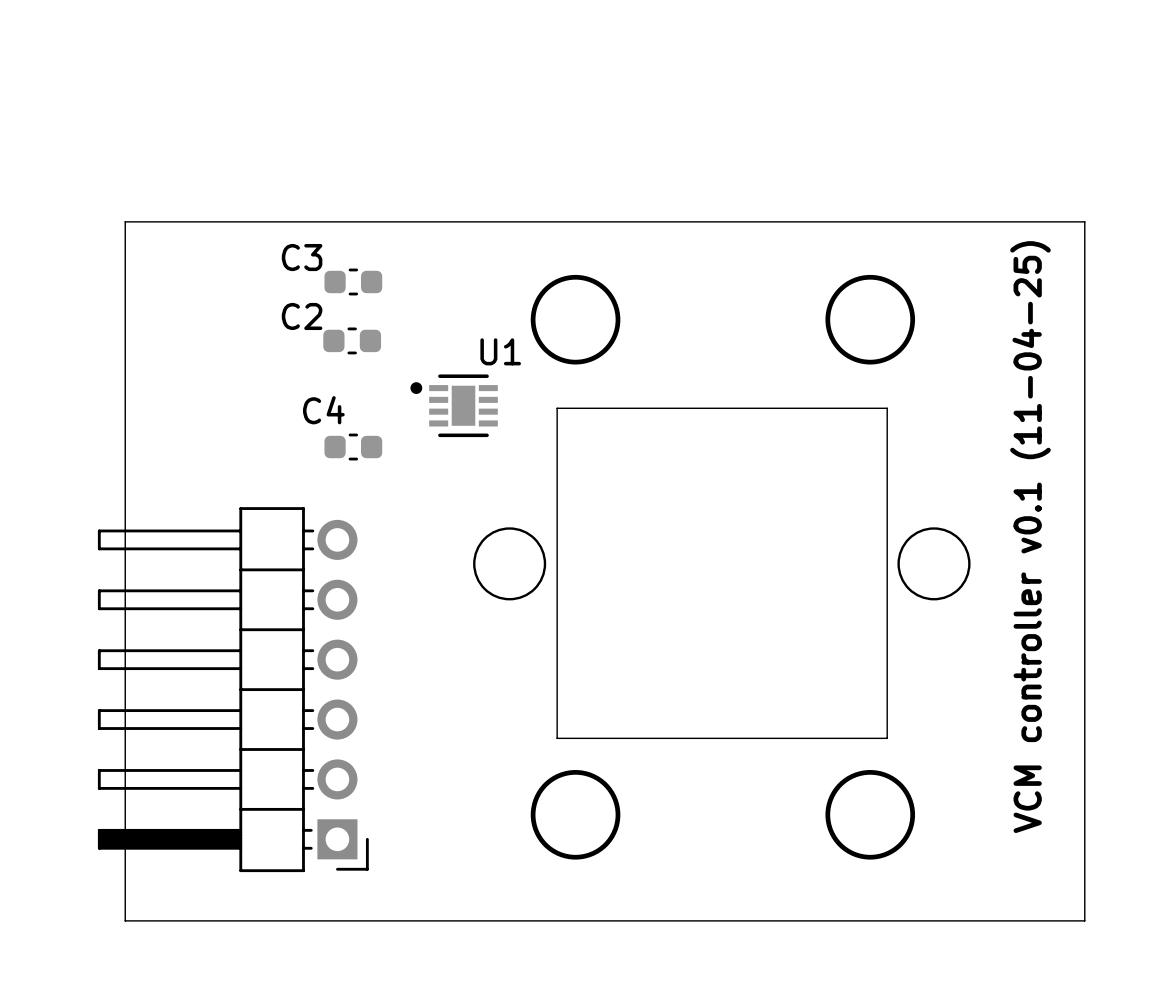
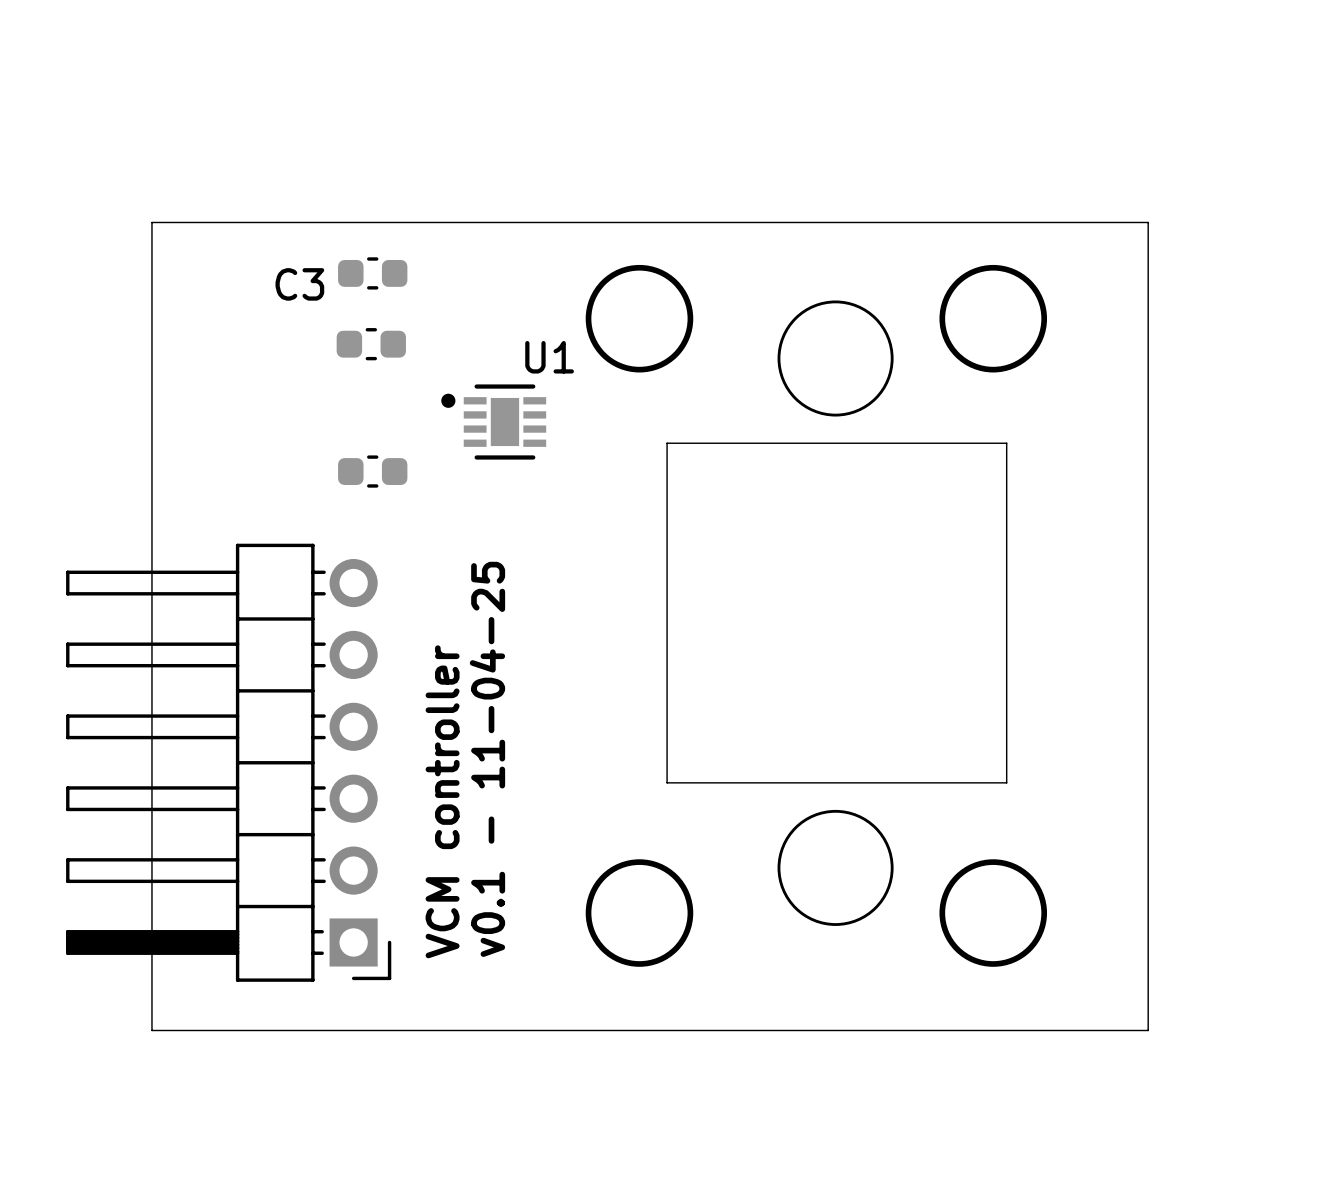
board edge: (125, 221) (1084, 221) (1084, 920) (125, 920) (125, 221) -> (151, 222) (151, 1030) (1148, 1030) (1148, 222) (151, 222)
C3 name position: C3 (302, 257) -> C3 (299, 284)
round board edge: none -> [777, 300, 894, 417]
C2 name: C2 (302, 316) -> none
board edge: (557, 408) (887, 408) (887, 738) (557, 738) (557, 408) -> (667, 443) (667, 782) (1006, 782) (1006, 443) (667, 443)
C4 name: C4 (323, 410) -> none
round board edge: [473, 527, 547, 601] -> none
round board edge: [897, 527, 971, 601] -> none
text: VCM controller v0.1 (11-04-25) (1030, 537) -> none
text: none -> v0.1 - 11-04-25 (487, 759)
text: none -> VCM controller (442, 801)
round board edge: none -> [777, 809, 894, 926]

